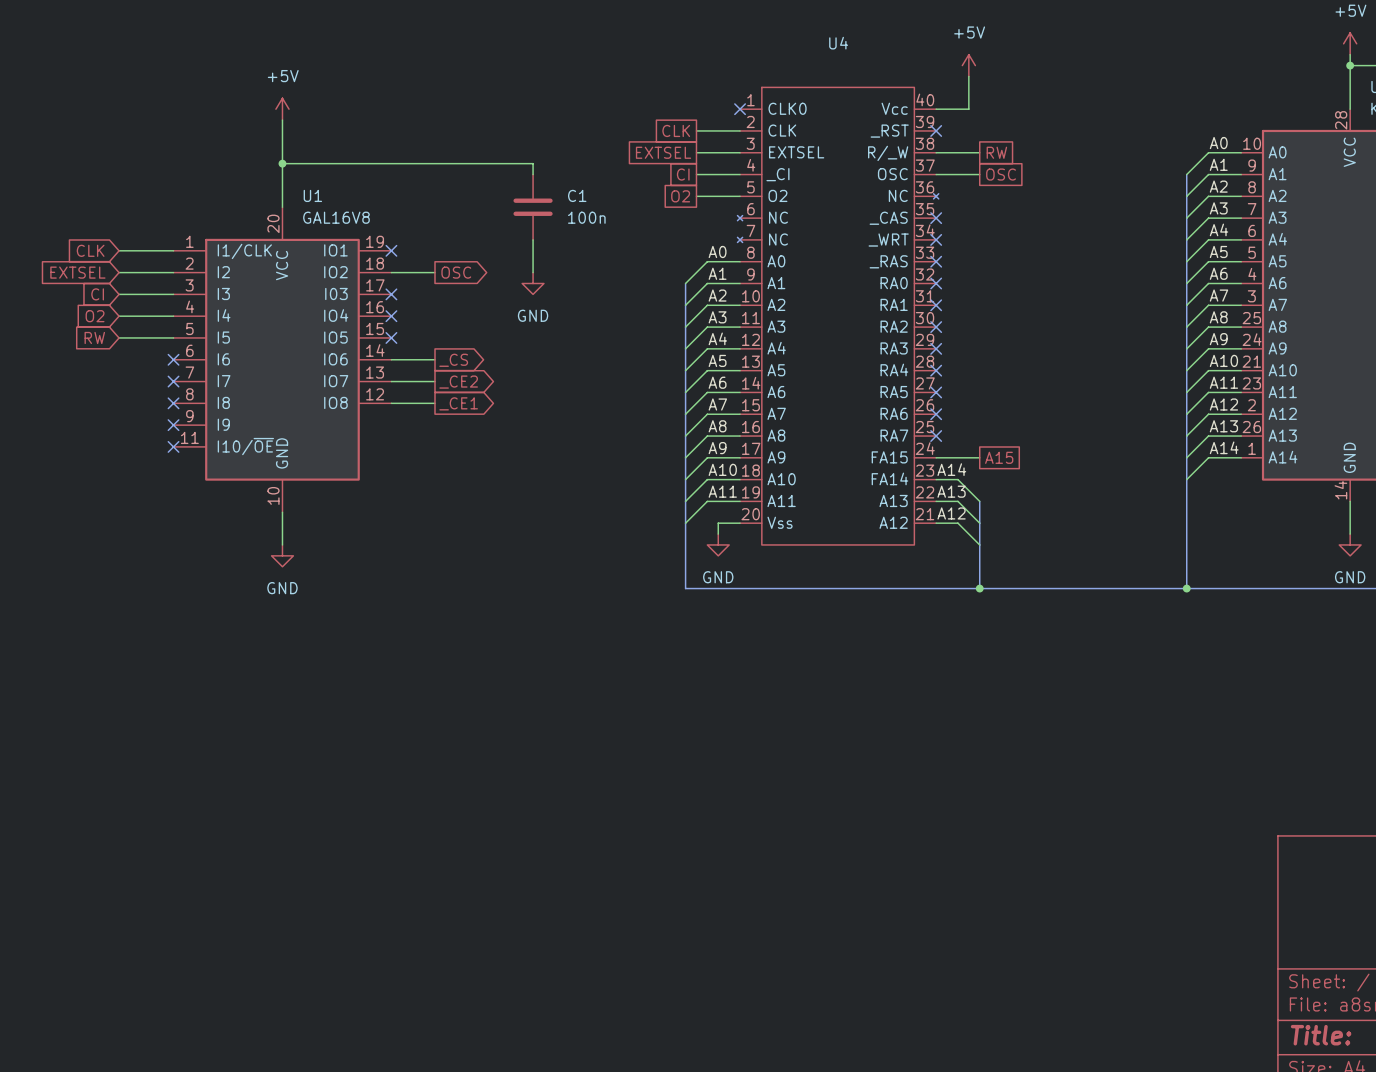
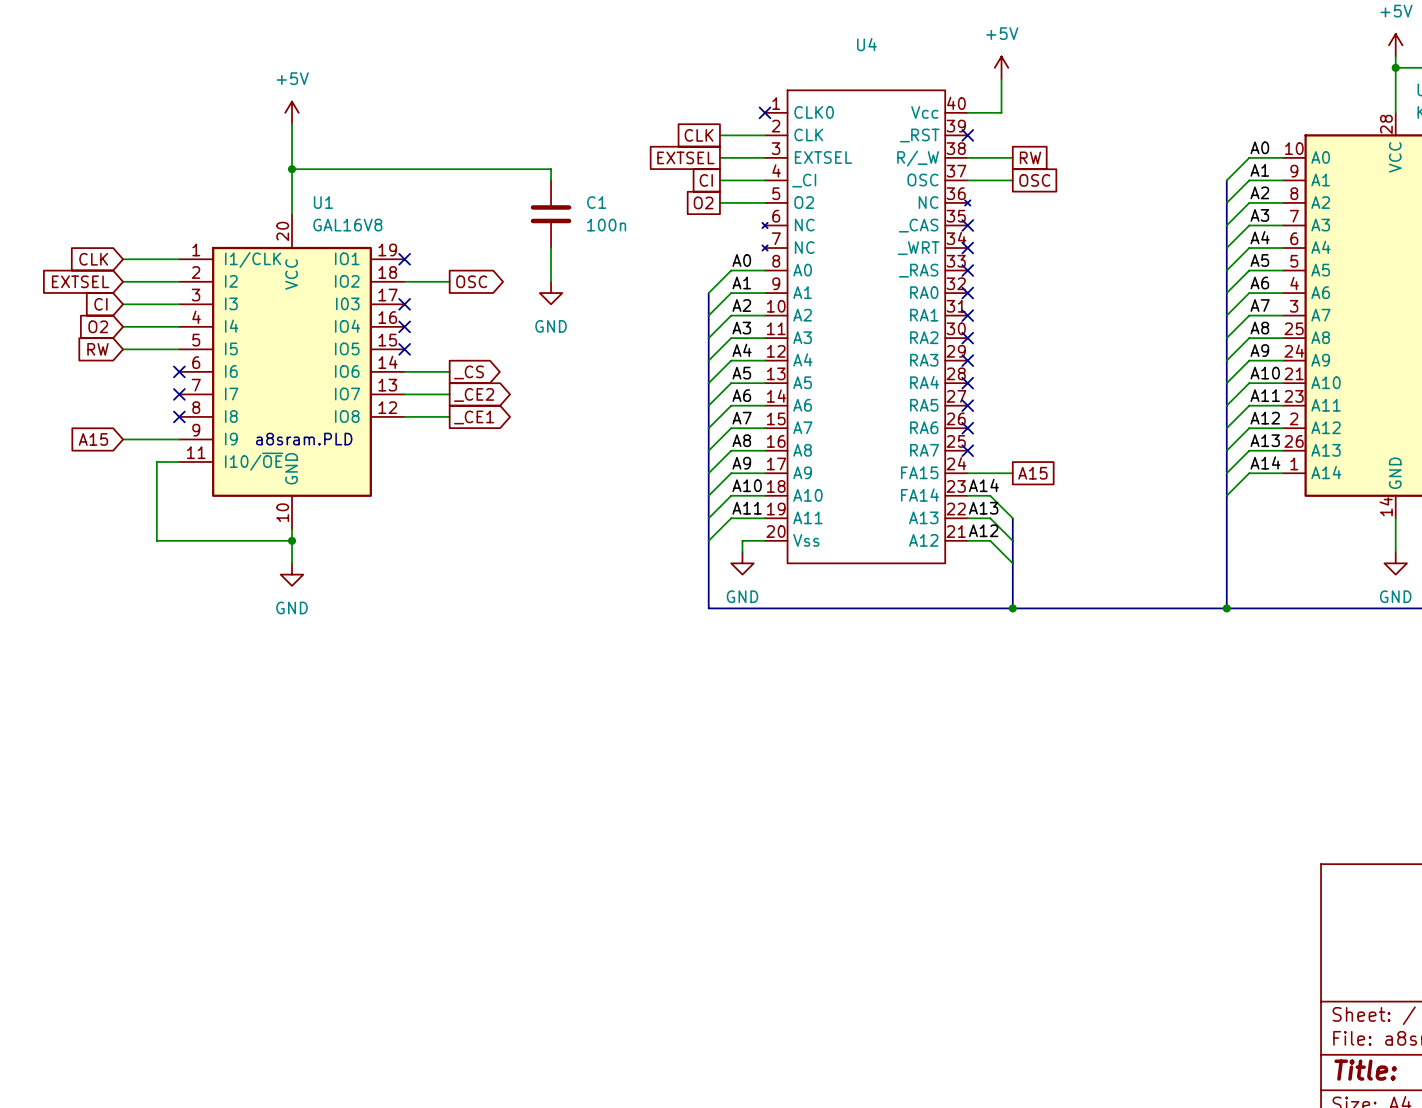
text: none -> a8sram.PLD (304, 439)
global label: none -> A15 (93, 439)
wire: none -> (123, 439) (179, 439)
no-connect mark: (173, 425) -> none
wire: none -> (179, 461) (156, 461) (156, 540) (292, 540)
no-connect mark: (173, 446) -> none
junction: none -> (292, 540)

